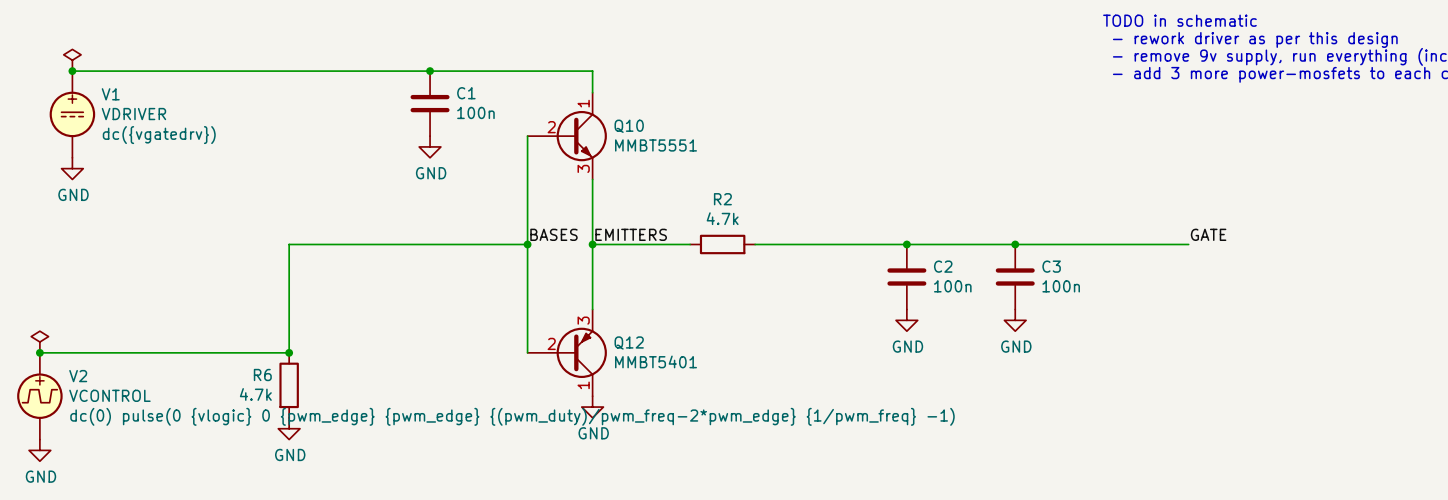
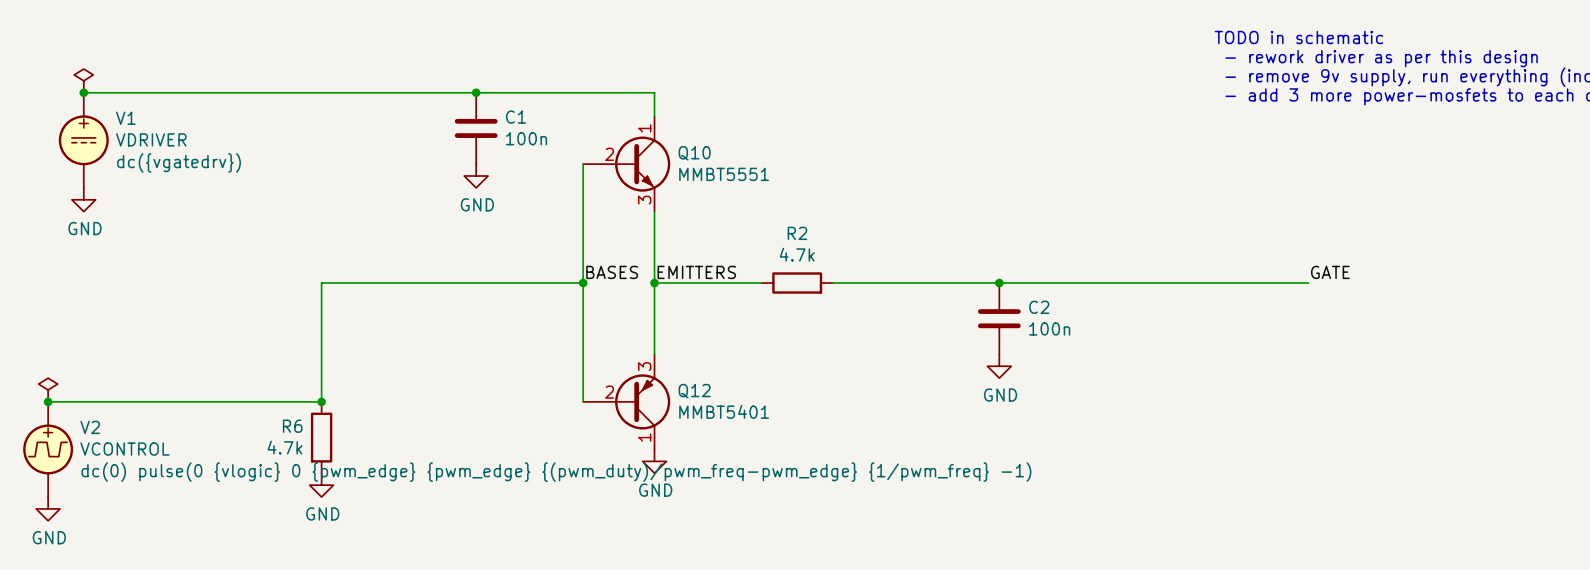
junction: (1015, 244) -> none
C3: 100n (1015, 277) -> none
power symbol: GND (1015, 320) -> none
V2 text: dc(0) pulse(0 {vlogic} 0 {pwm_edge} {pwm_edge} {(pwm_duty)/pwm_freq-2*pwm_edge} {1/pwm_freq} -1) (512, 416) -> dc(0) pulse(0 {vlogic} 0 {pwm_edge} {pwm_edge} {(pwm_duty)/pwm_freq-pwm_edge} {1/pwm_freq} -1) (556, 472)

